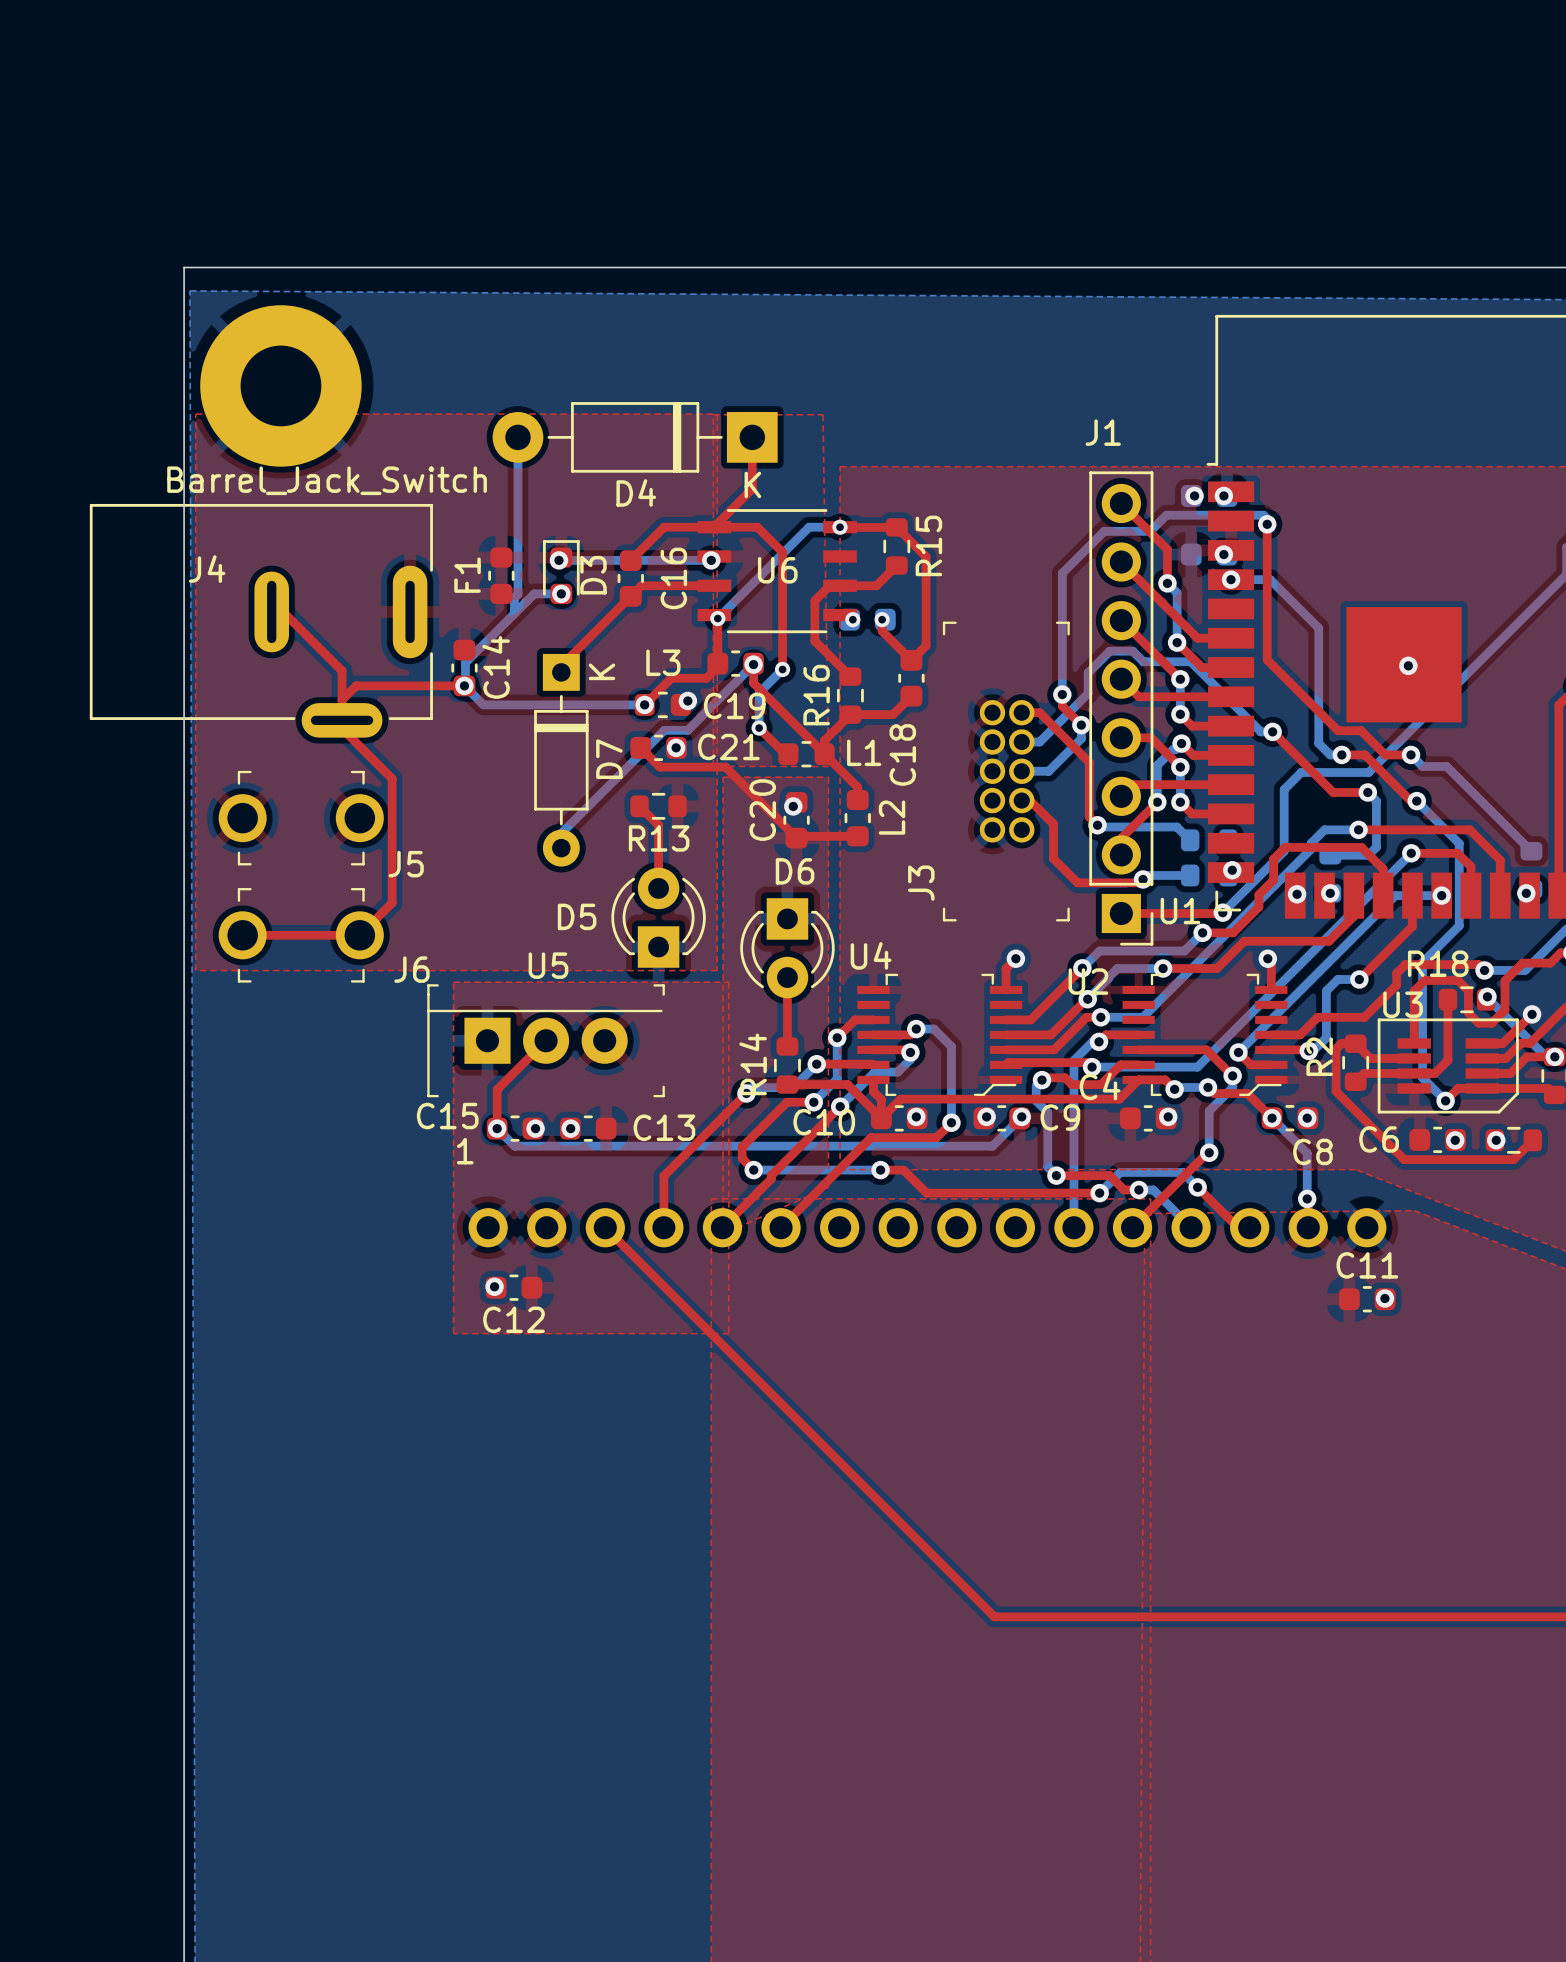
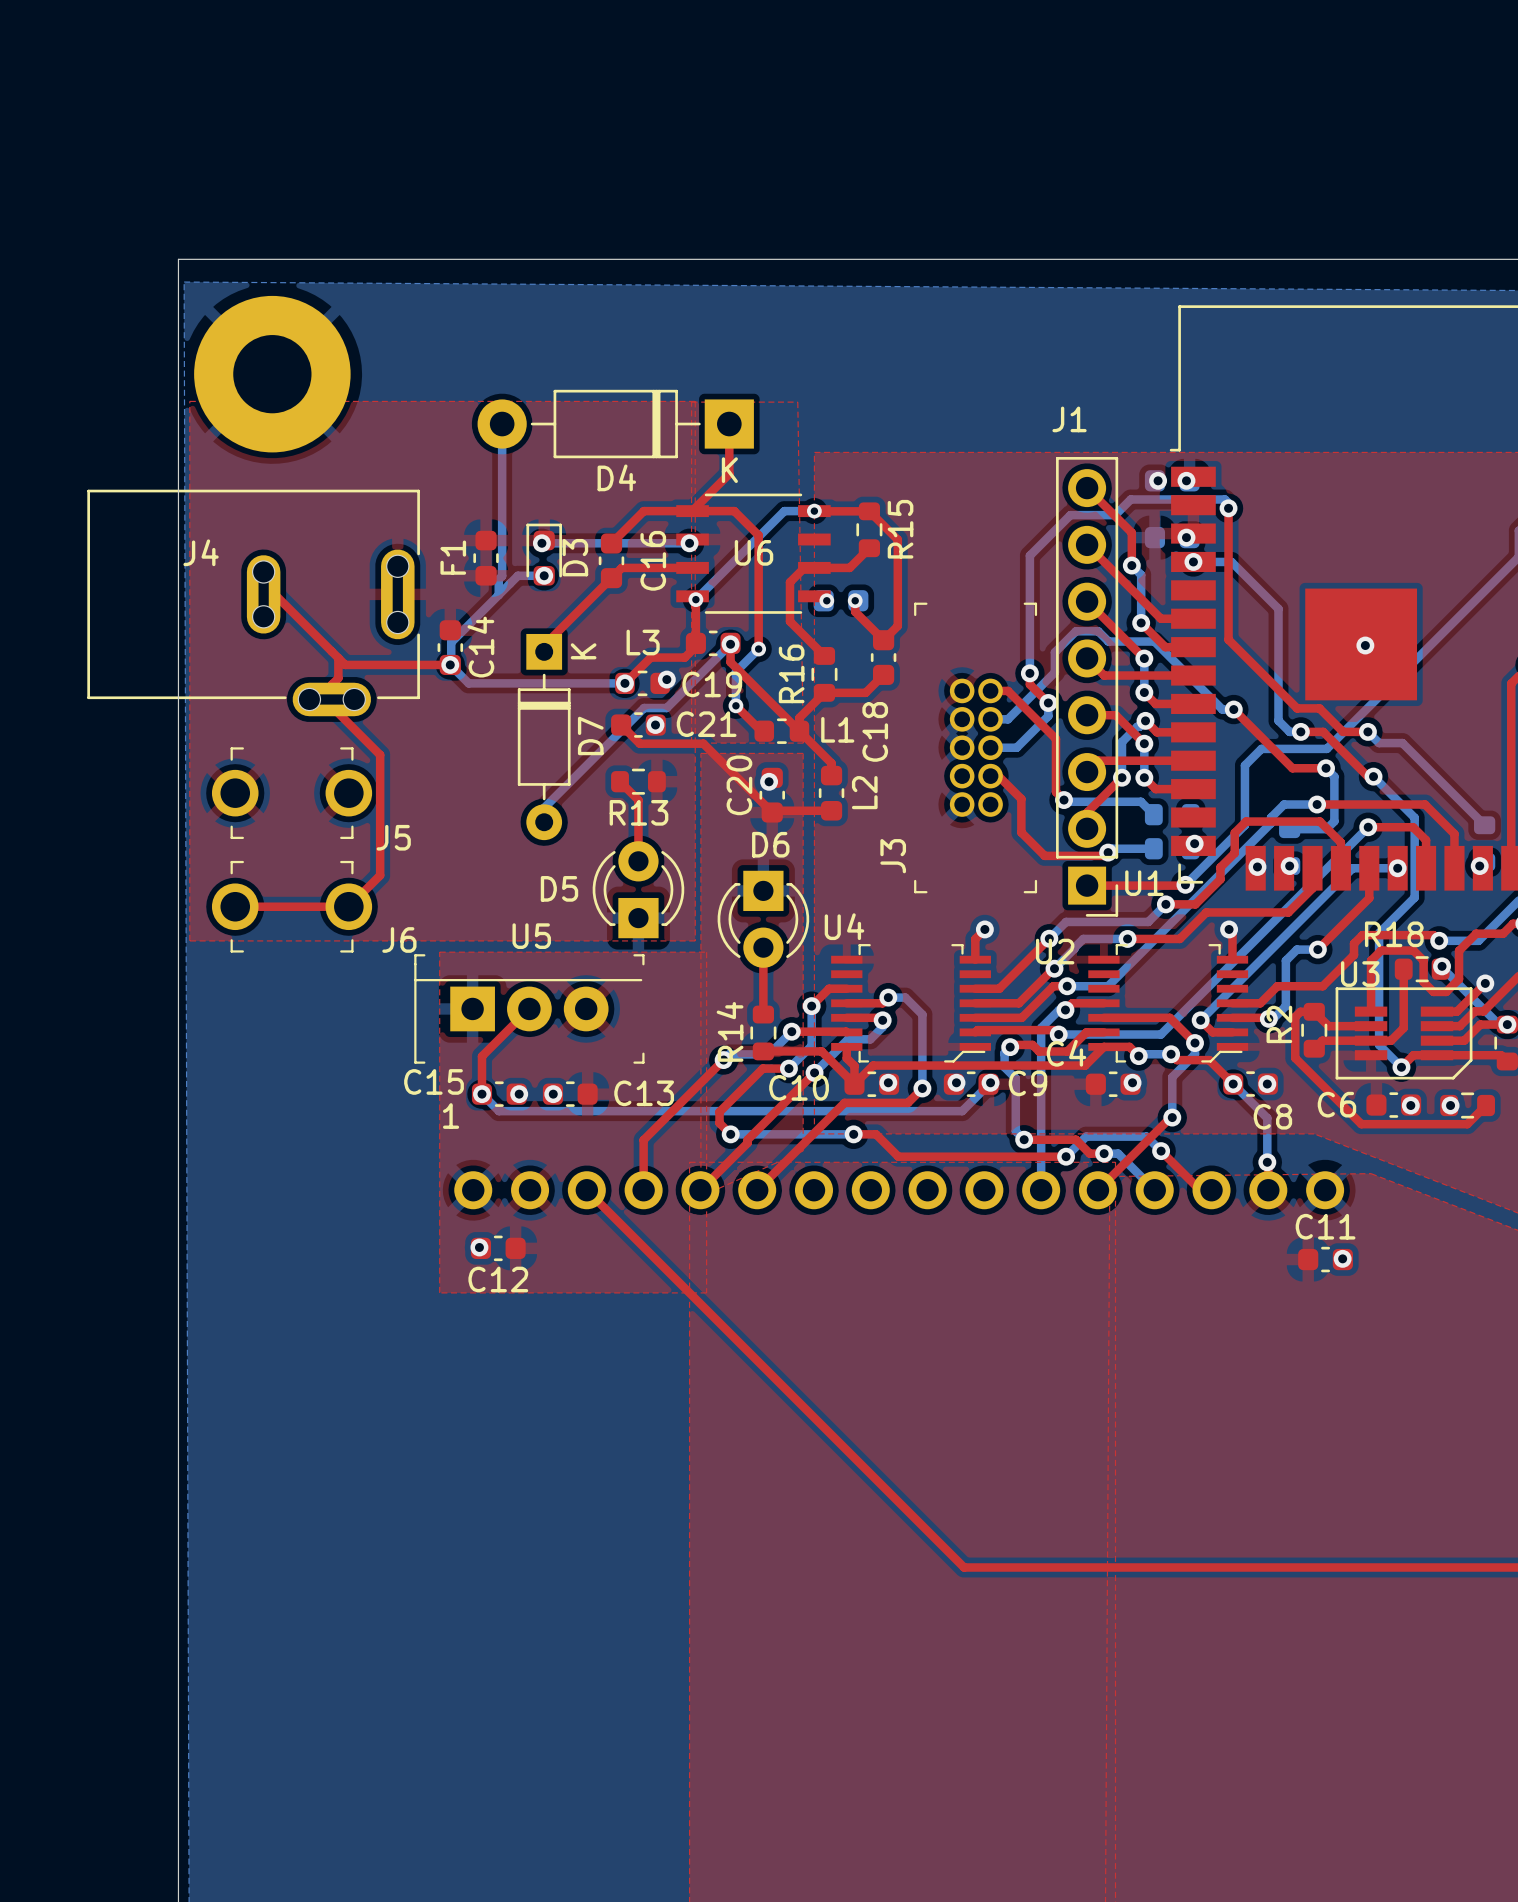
J4 value: Barrel_Jack_Switch (327, 480) -> none
J4 footprint: [89, 503, 433, 738] -> [87, 489, 420, 717]
top track: (271, 611) (283, 611) (342, 670) (342, 728) -> none
top track: none -> (338, 658) (338, 678) (331, 684) (331, 699)
top track: (356, 685) (342, 699) -> (345, 664) (274, 594) (263, 594)

